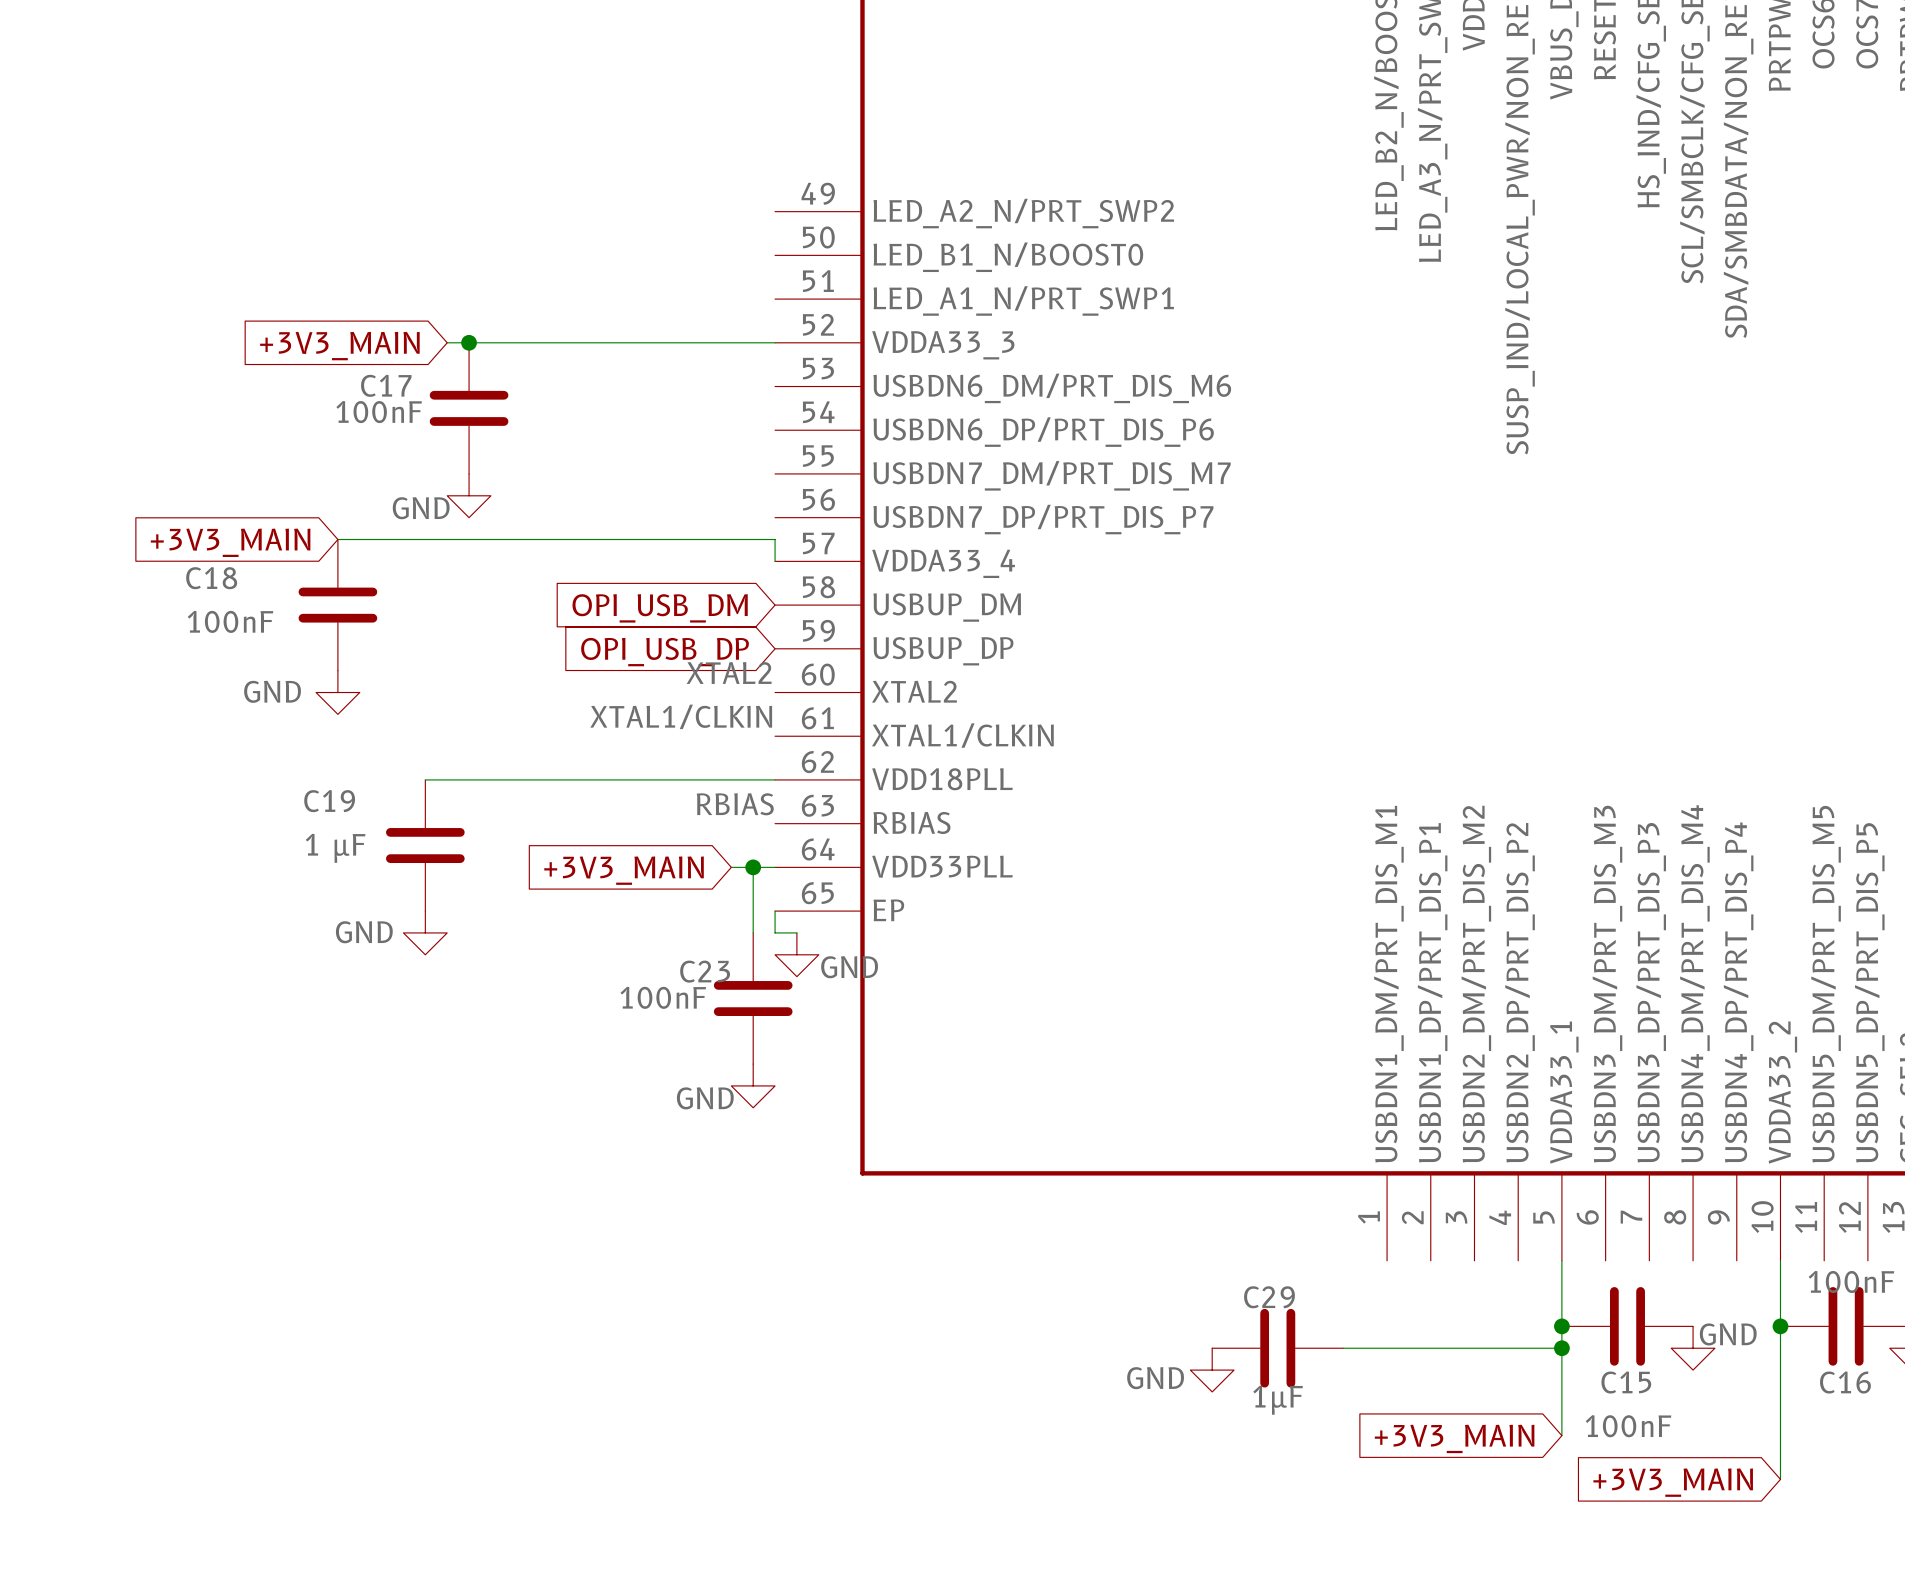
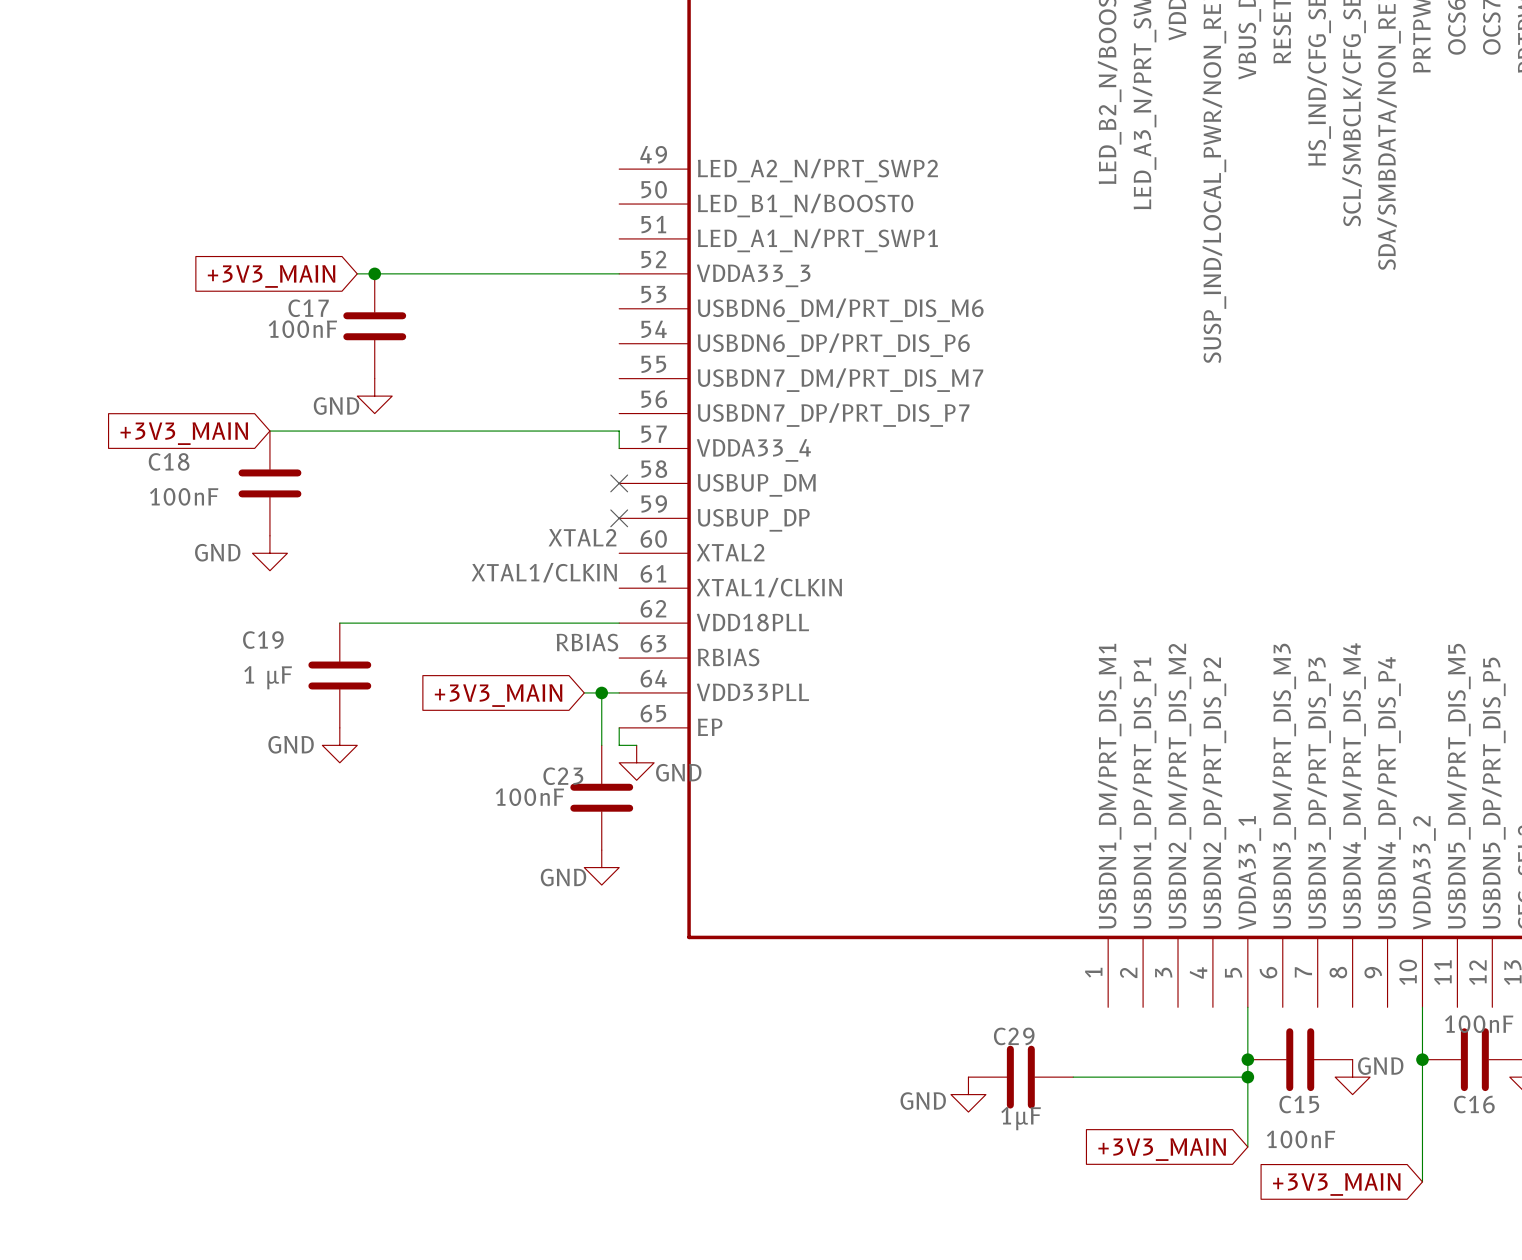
no-connect mark: none -> (619, 483)
global label: OPI_USB_DM (660, 608) -> none
no-connect mark: none -> (619, 518)
global label: OPI_USB_DP (665, 652) -> none

